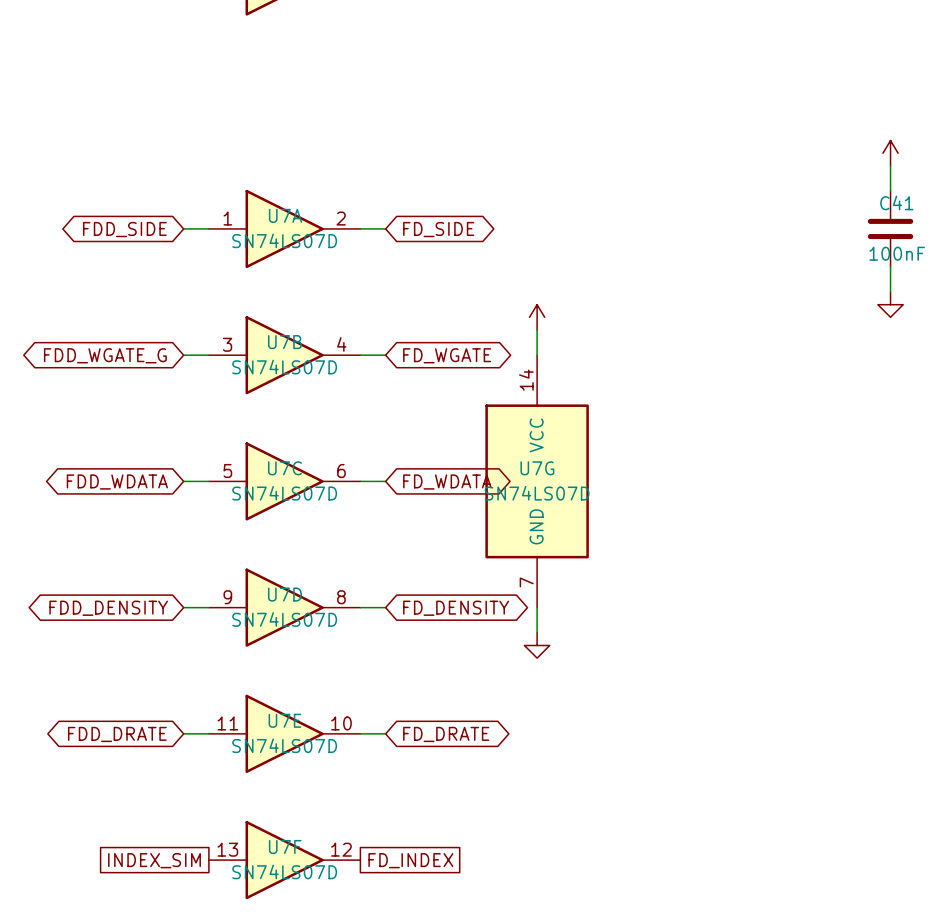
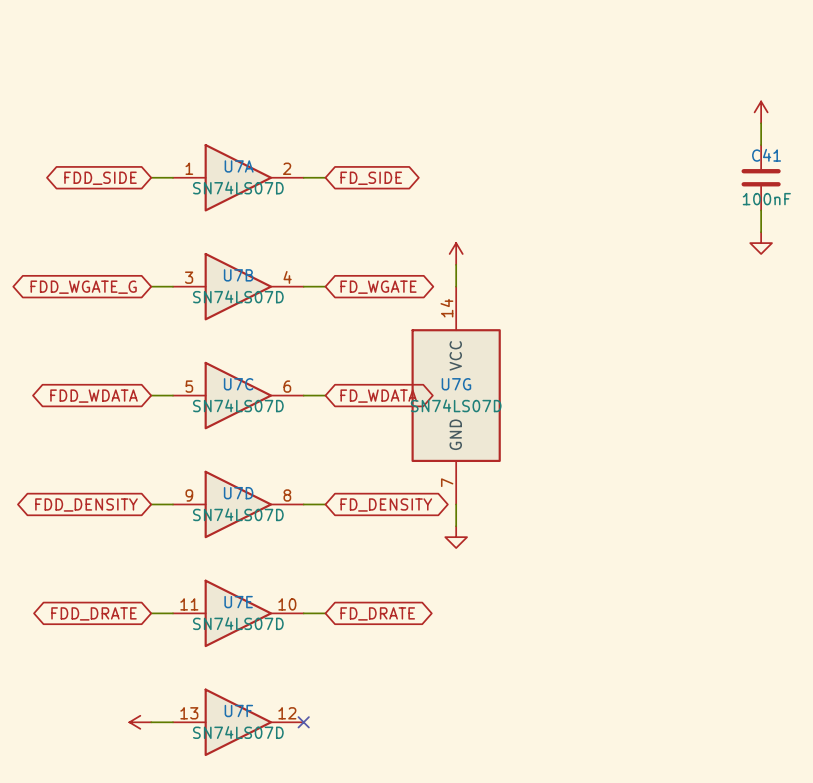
global label: INDEX_SIM (154, 860) -> none
power symbol: none -> (140, 722)
wire: none -> (151, 722) (173, 722)
no-connect mark: none -> (303, 722)
global label: FD_INDEX (410, 860) -> none

